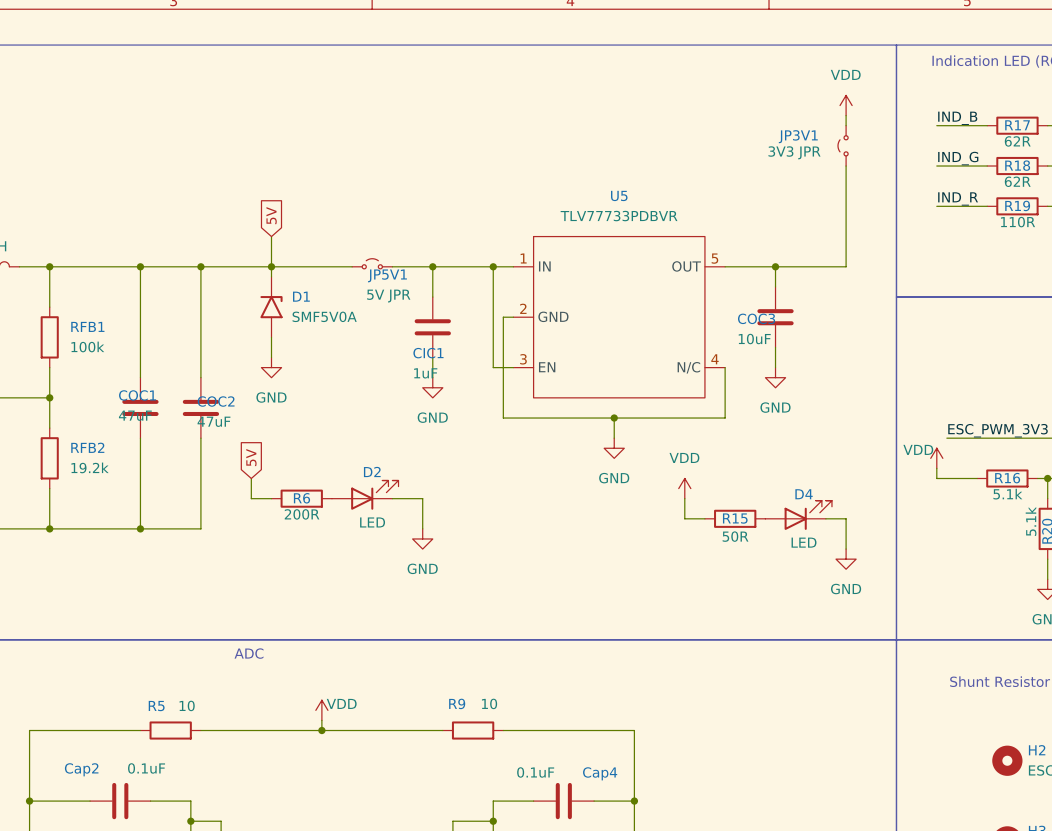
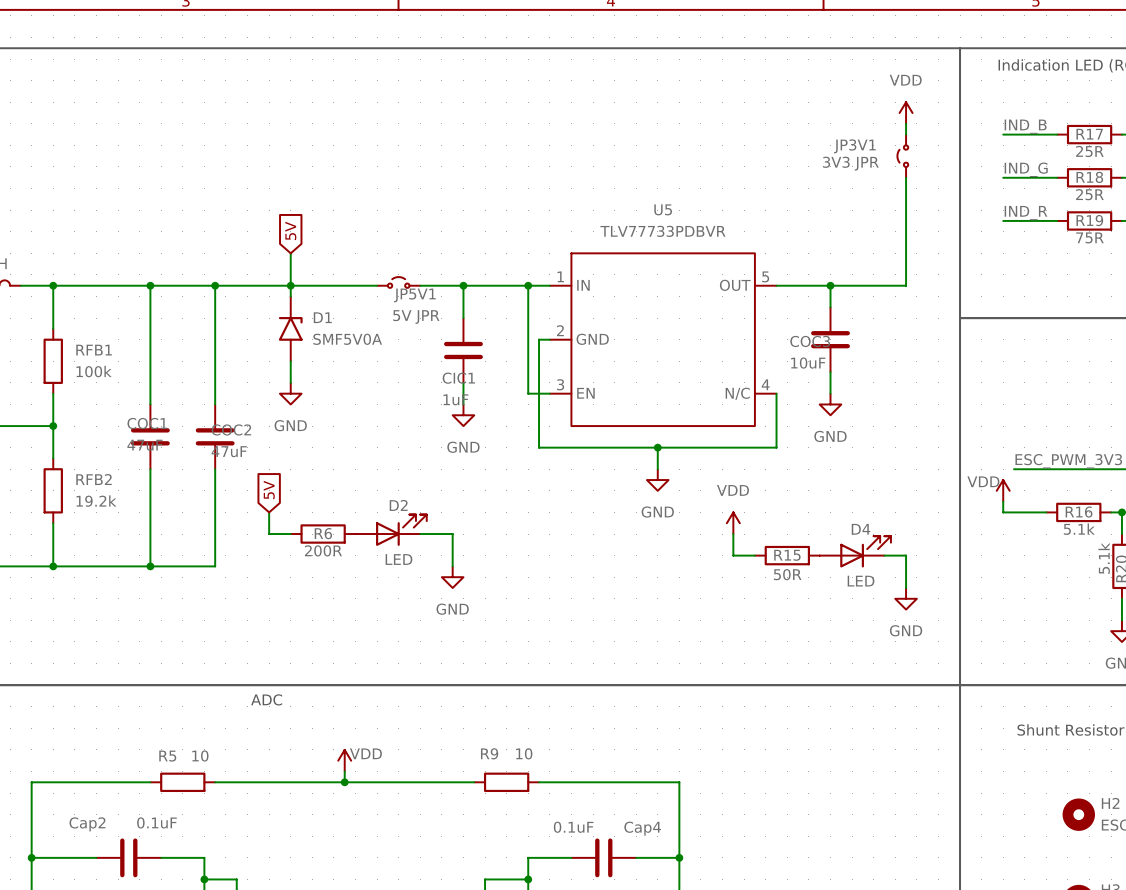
R17 value: 62R (1017, 141) -> 25R (1089, 151)
R18 value: 62R (1017, 181) -> 25R (1089, 194)
R19 value: 110R (1018, 222) -> 75R (1089, 237)

